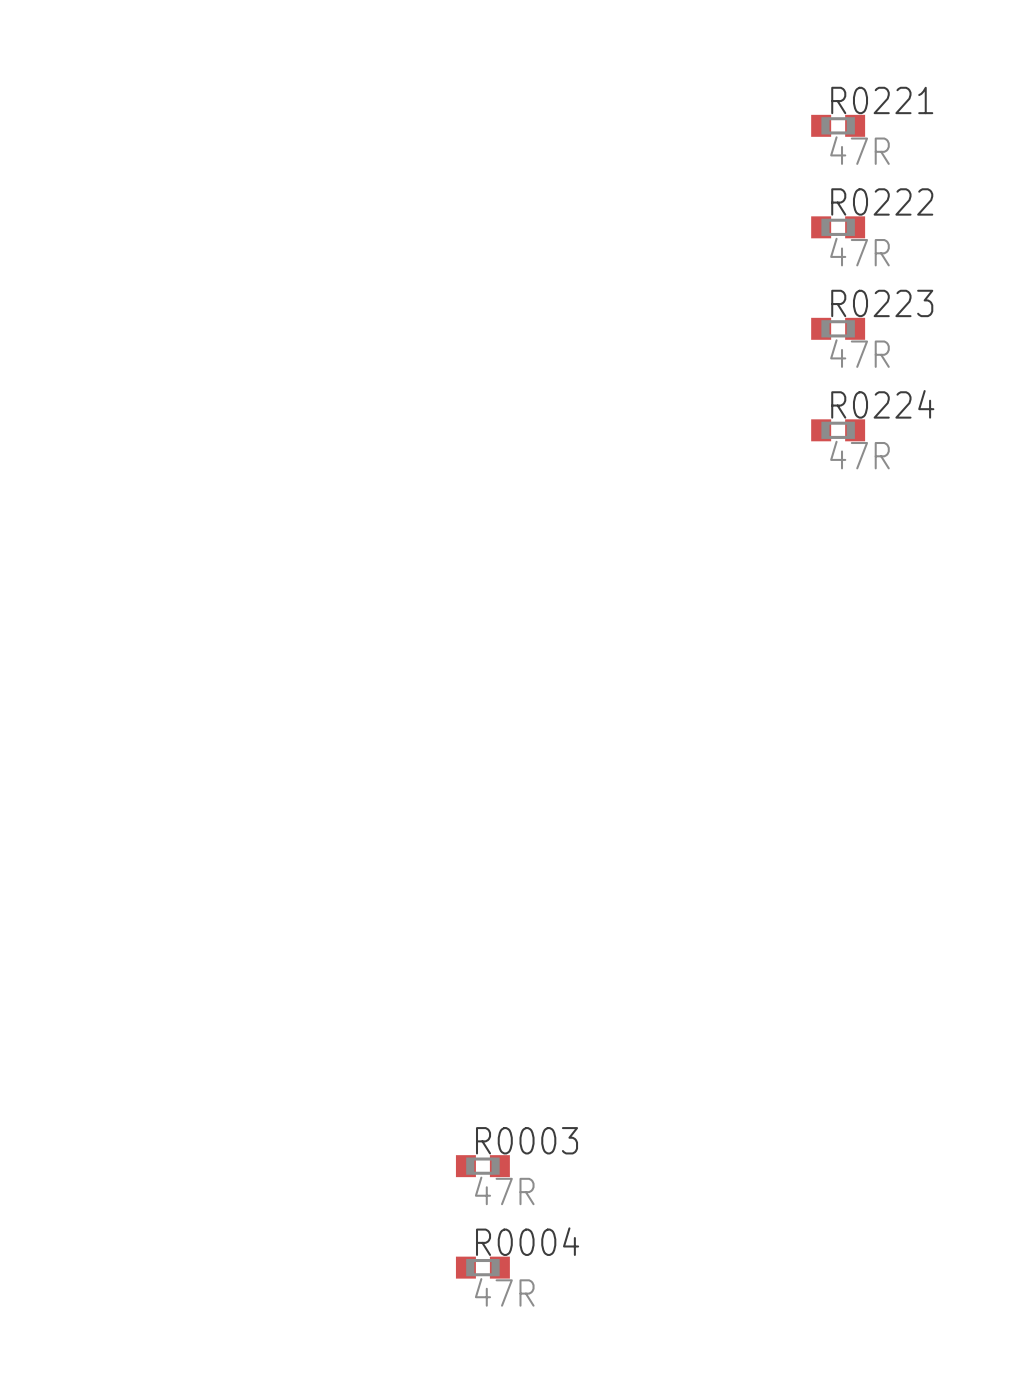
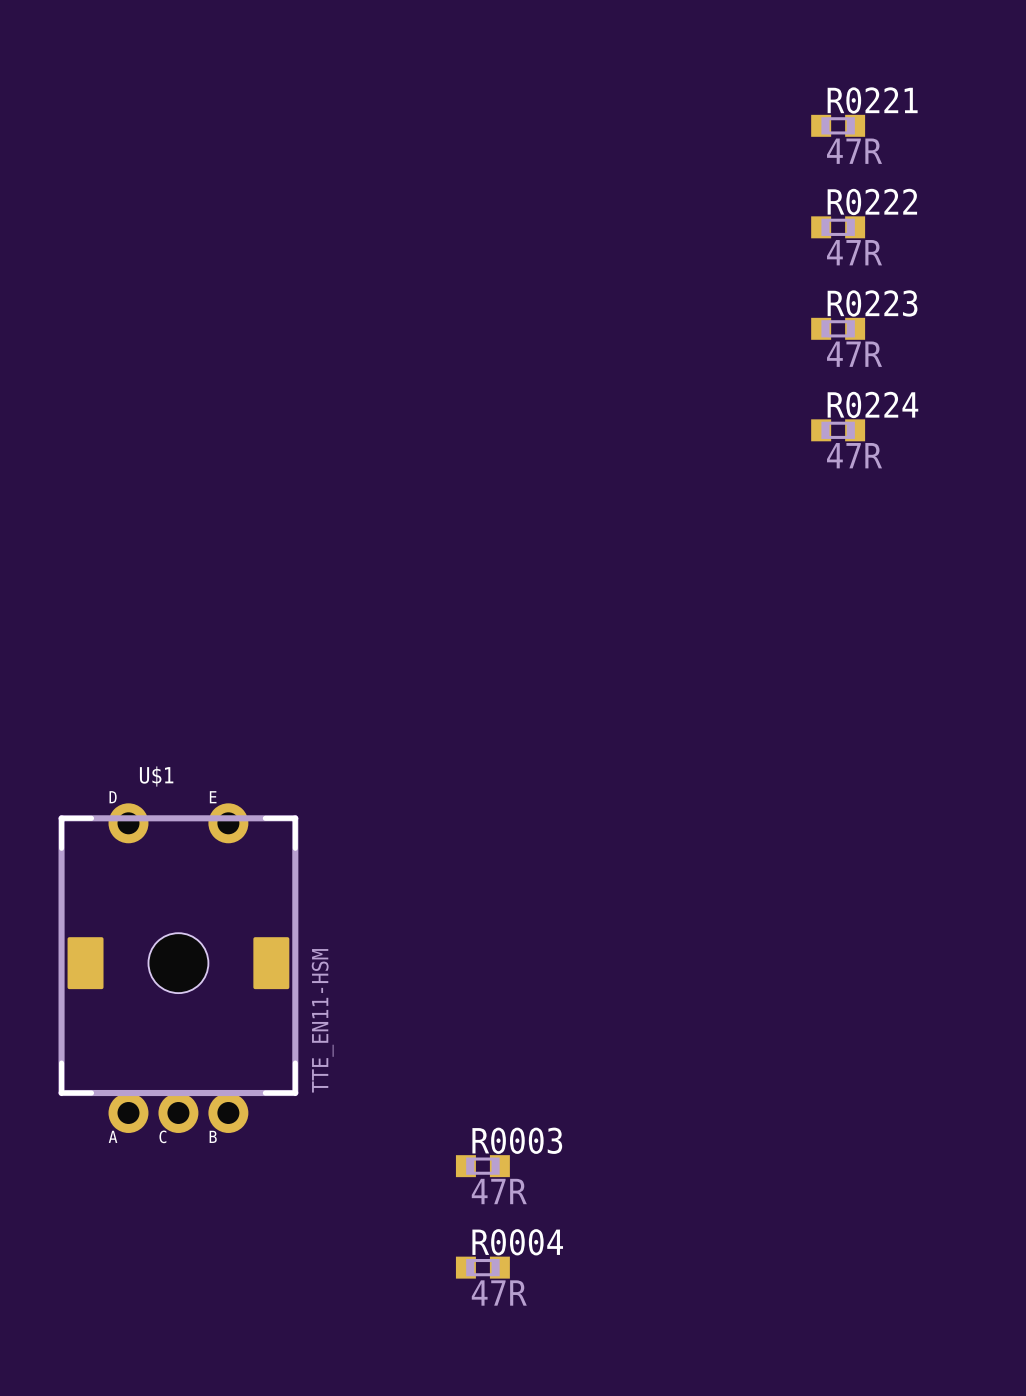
U$1: none -> TTE_EN11-HSM (178, 968)

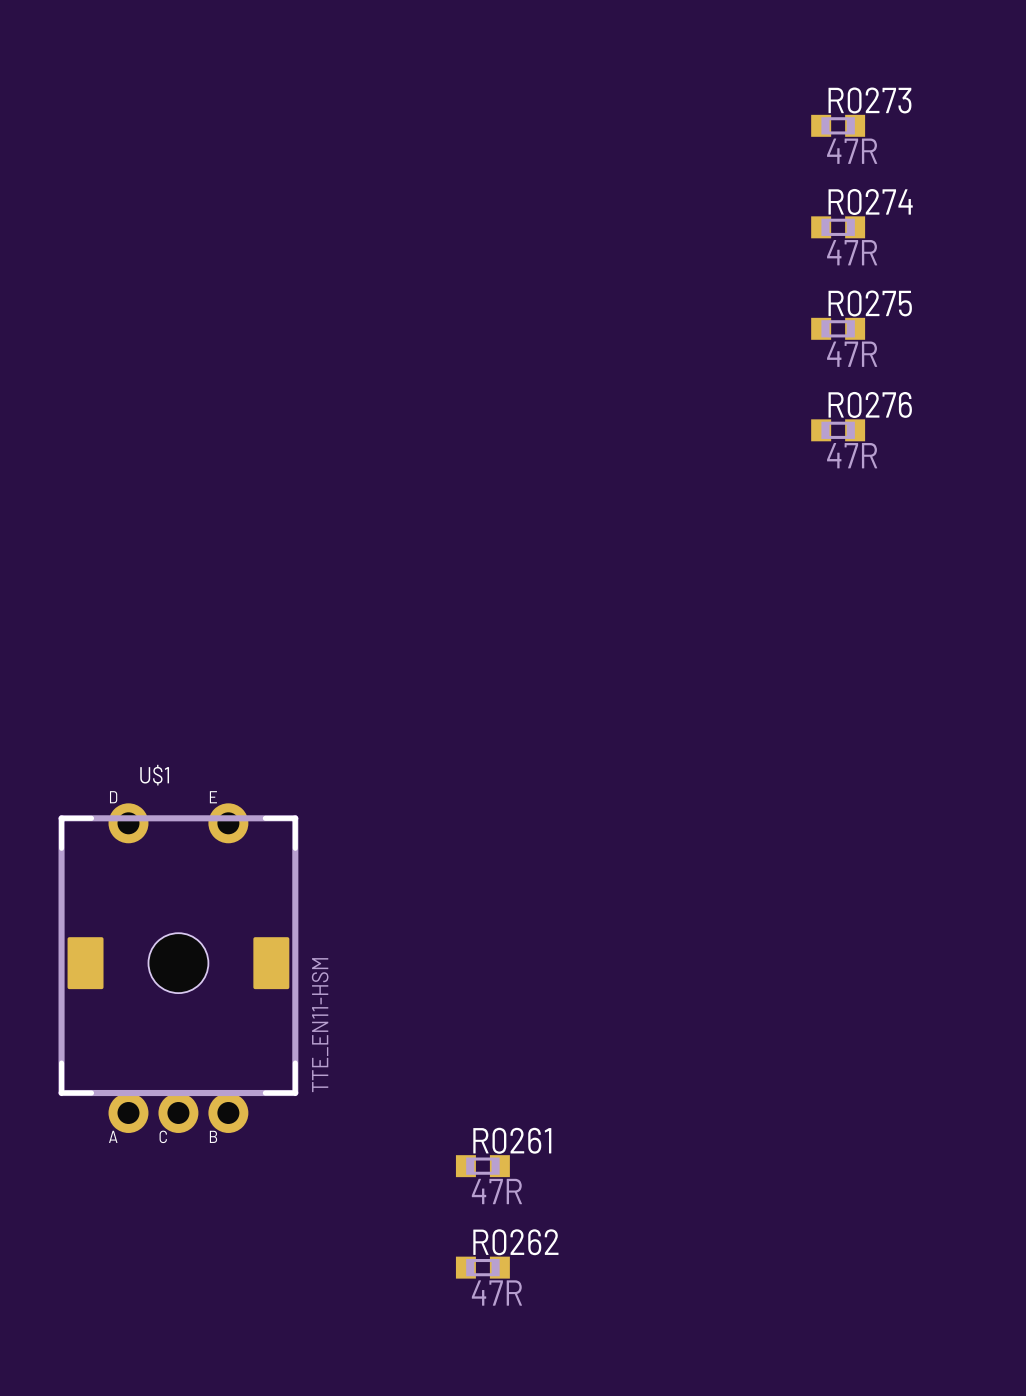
R0221 name: R0221 (872, 100) -> R0273 (869, 100)
R0222 name: R0222 (872, 201) -> R0274 (870, 201)
R0223 name: R0223 (872, 303) -> R0275 (870, 303)
R0224 name: R0224 (872, 404) -> R0276 (870, 404)
R0003 name: R0003 (517, 1140) -> R0261 (512, 1140)
R0004 name: R0004 (517, 1242) -> R0262 (515, 1242)

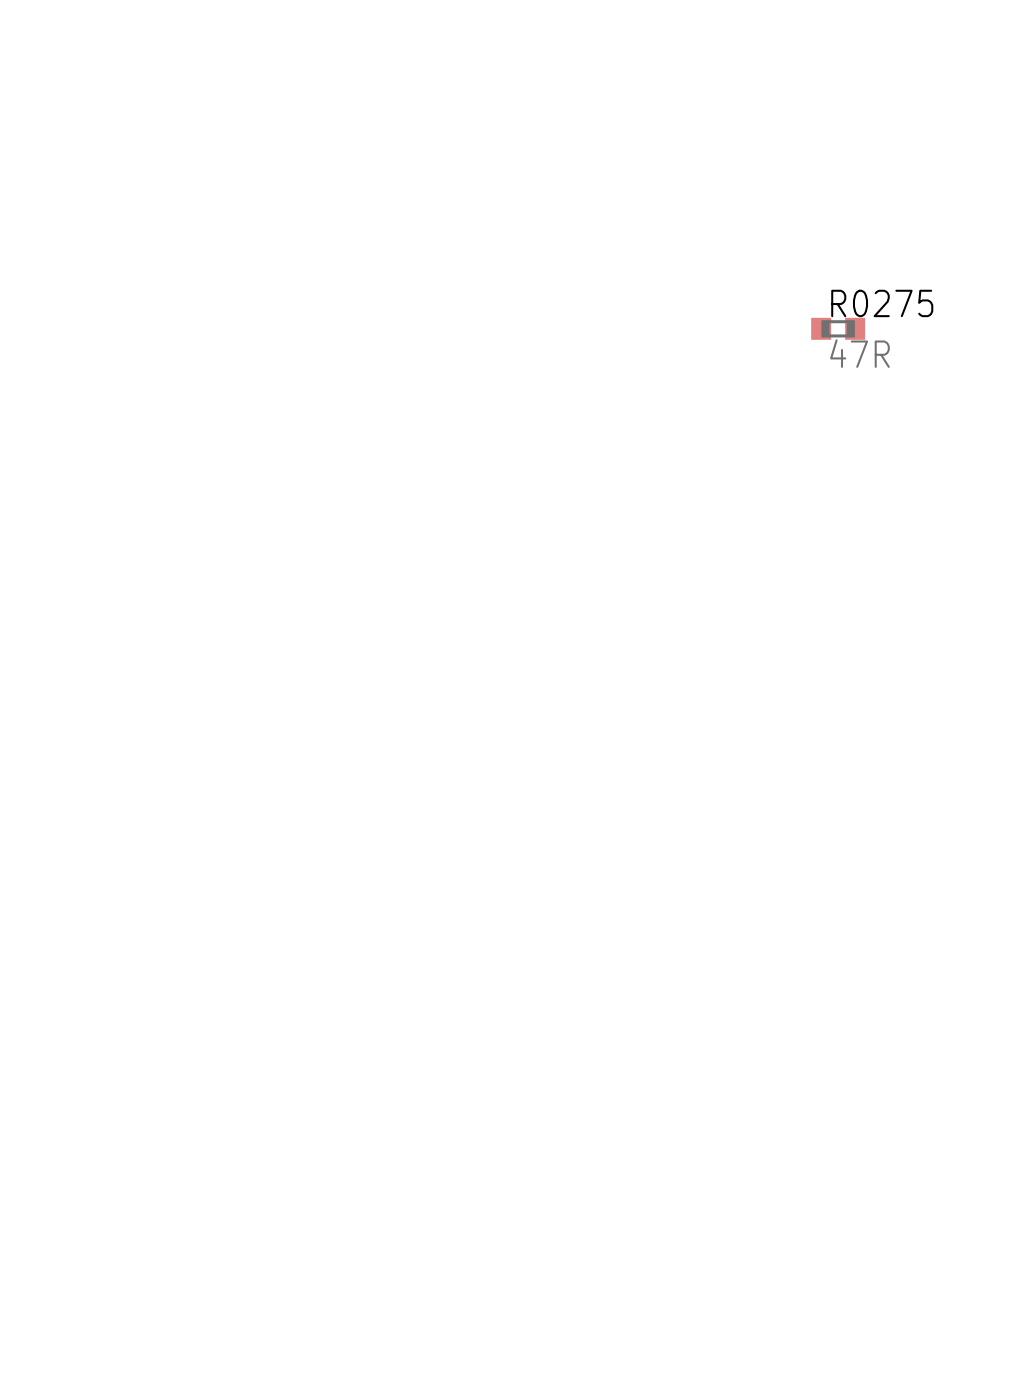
R0273: 47R (838, 125) -> none
R0274: 47R (838, 227) -> none
R0276: 47R (838, 430) -> none
U$1: TTE_EN11-HSM (178, 968) -> none
R0261: 47R (482, 1166) -> none
R0262: 47R (482, 1267) -> none

